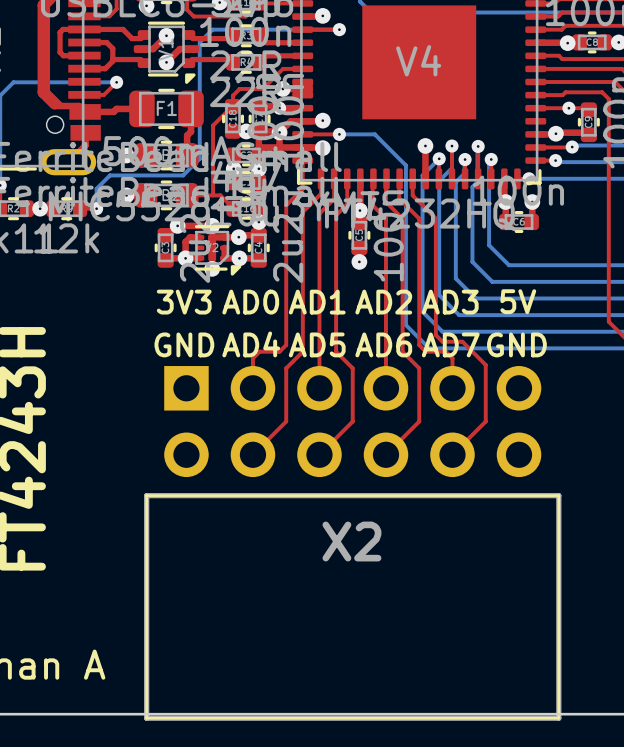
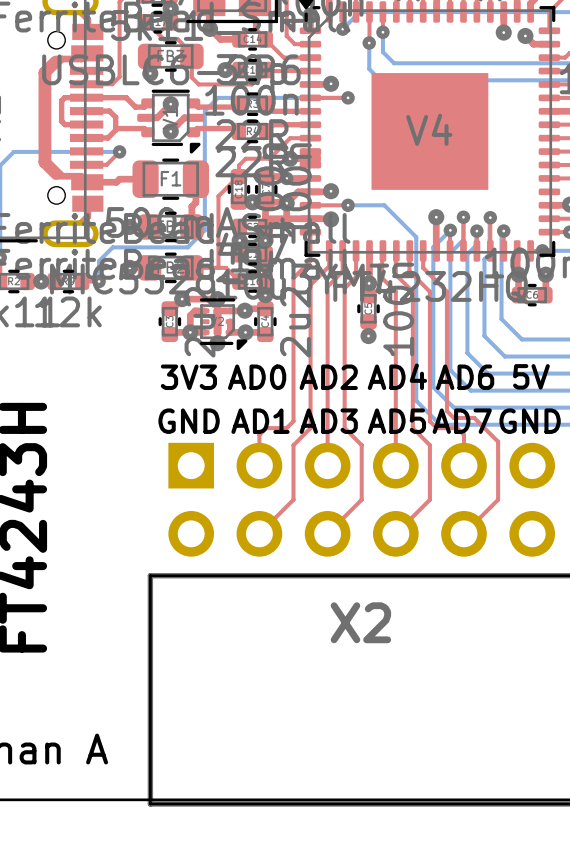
text position: AD1 (317, 302) -> AD1 (260, 421)
text position: AD2 (383, 302) -> AD2 (328, 377)
text position: AD3 (450, 302) -> AD3 (328, 421)
text position: AD4 (251, 344) -> AD4 (397, 376)
text position: AD5 (317, 344) -> AD5 (396, 421)
text position: AD6 (383, 344) -> AD6 (465, 377)

